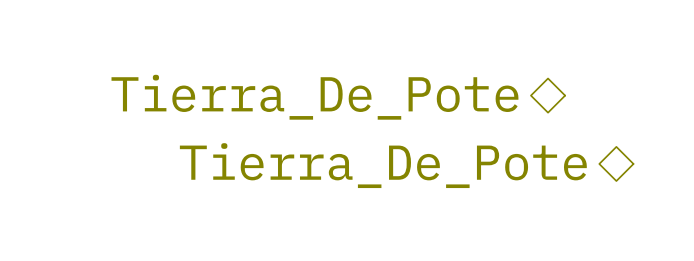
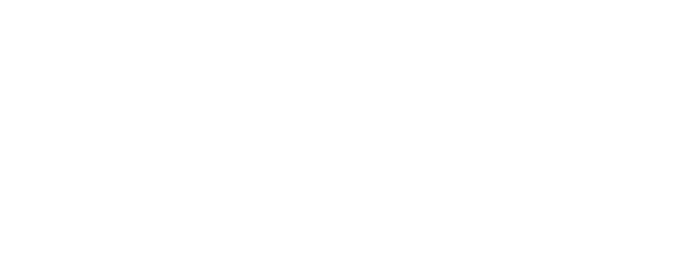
hierarchical label: Tierra_De_Pote (314, 97) -> none
hierarchical label: Tierra_De_Pote (383, 165) -> none

